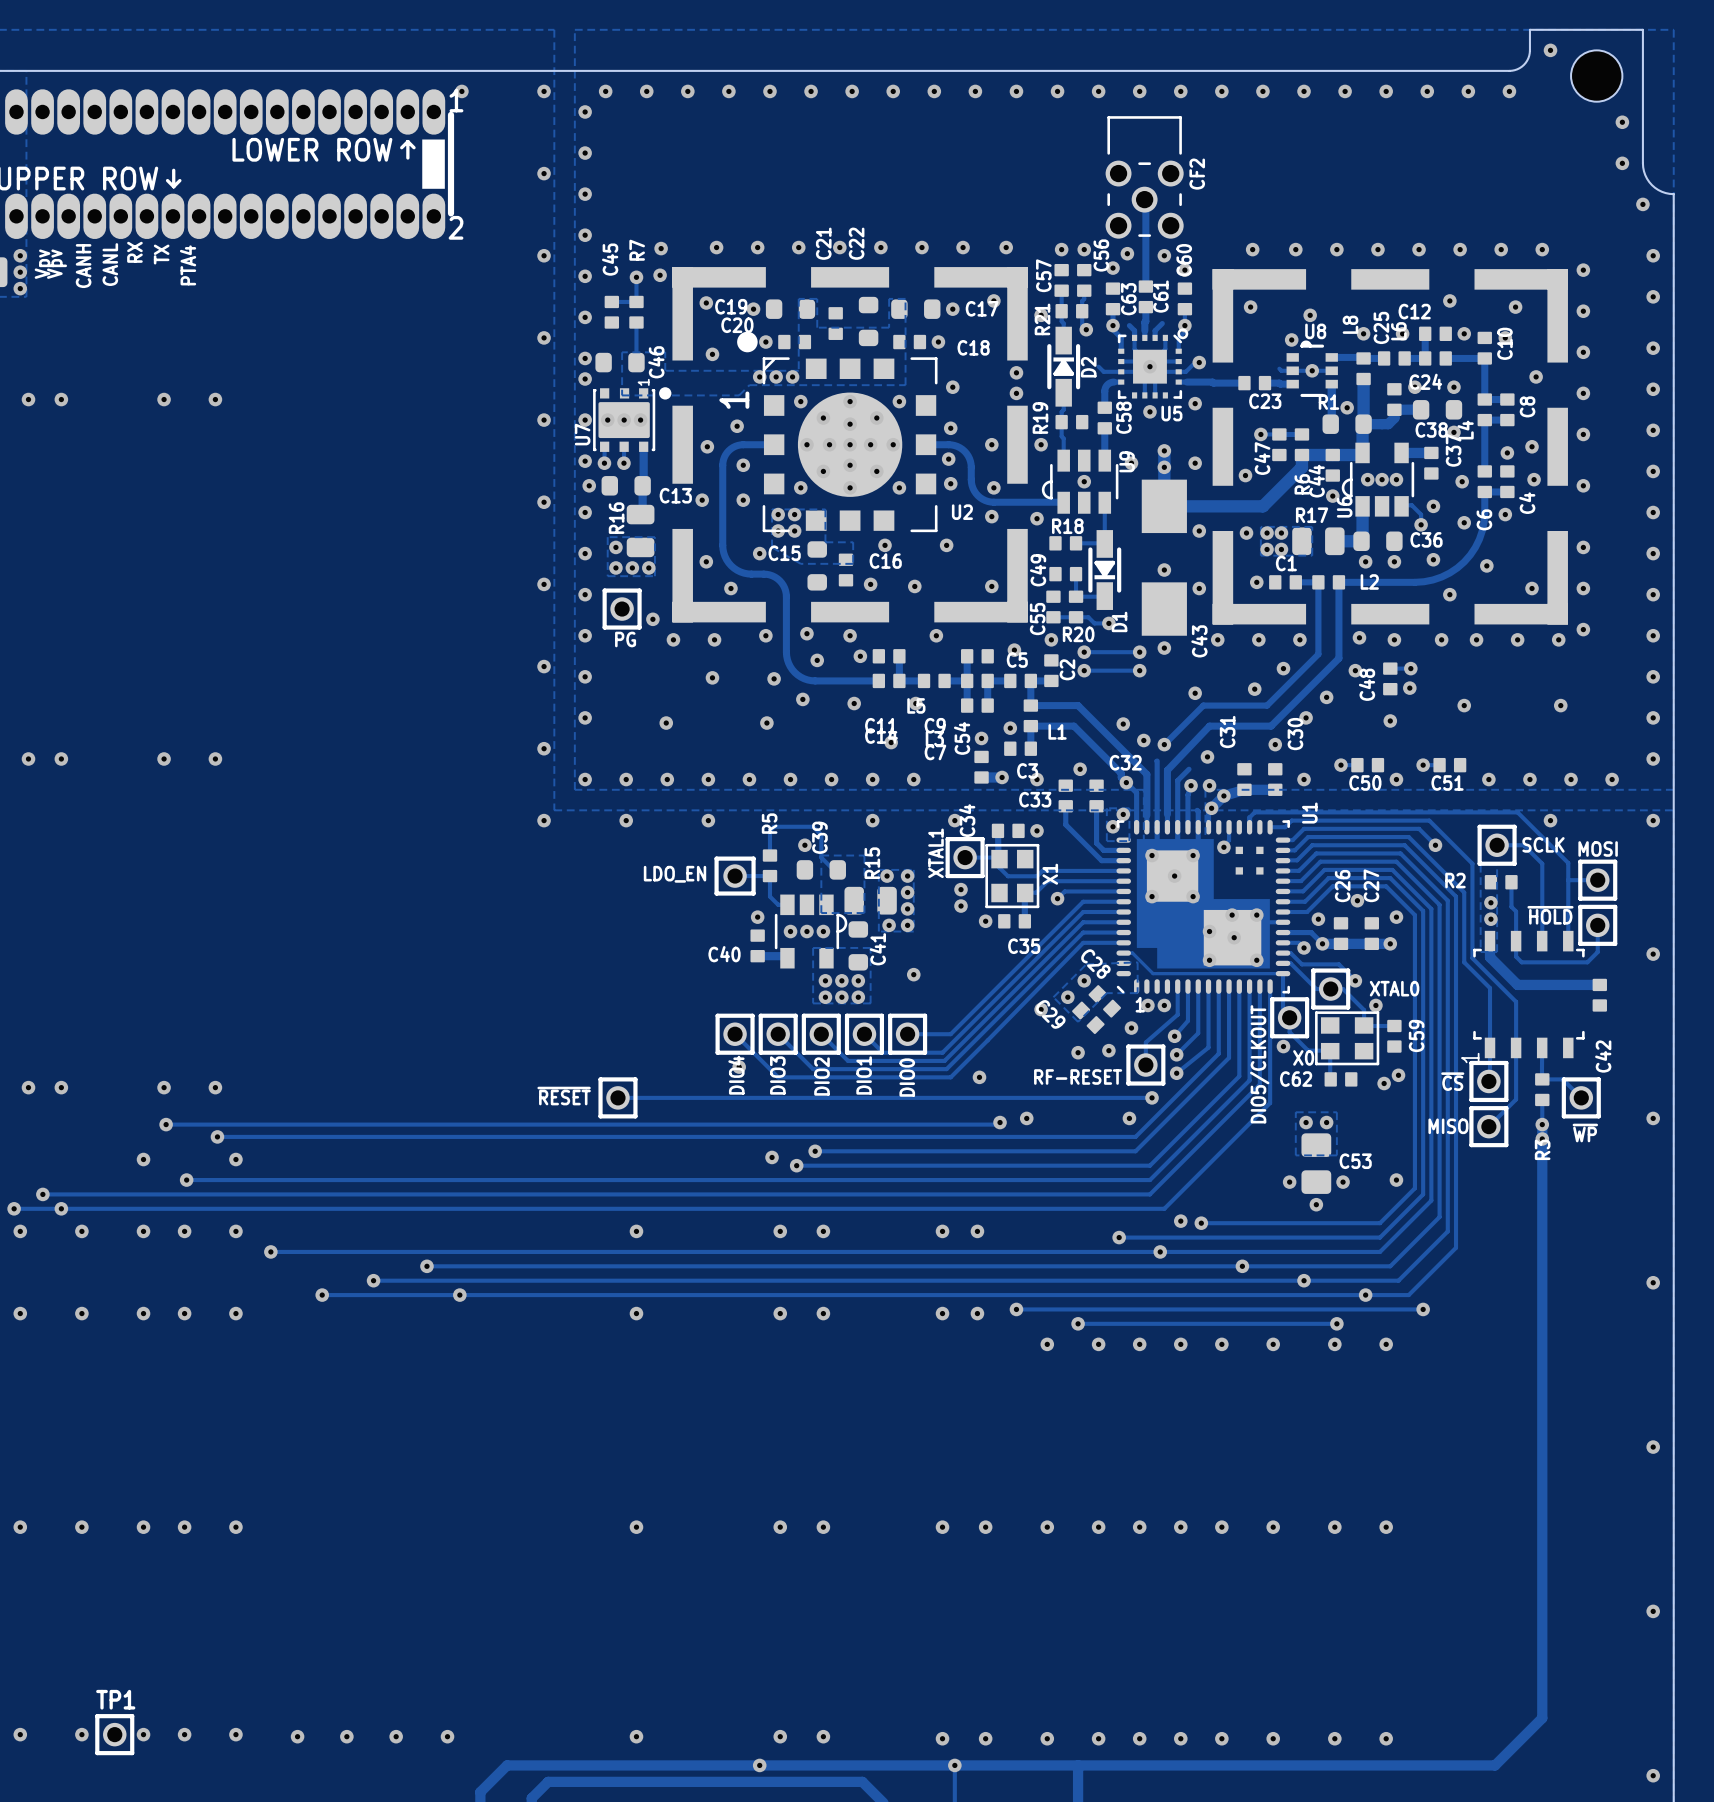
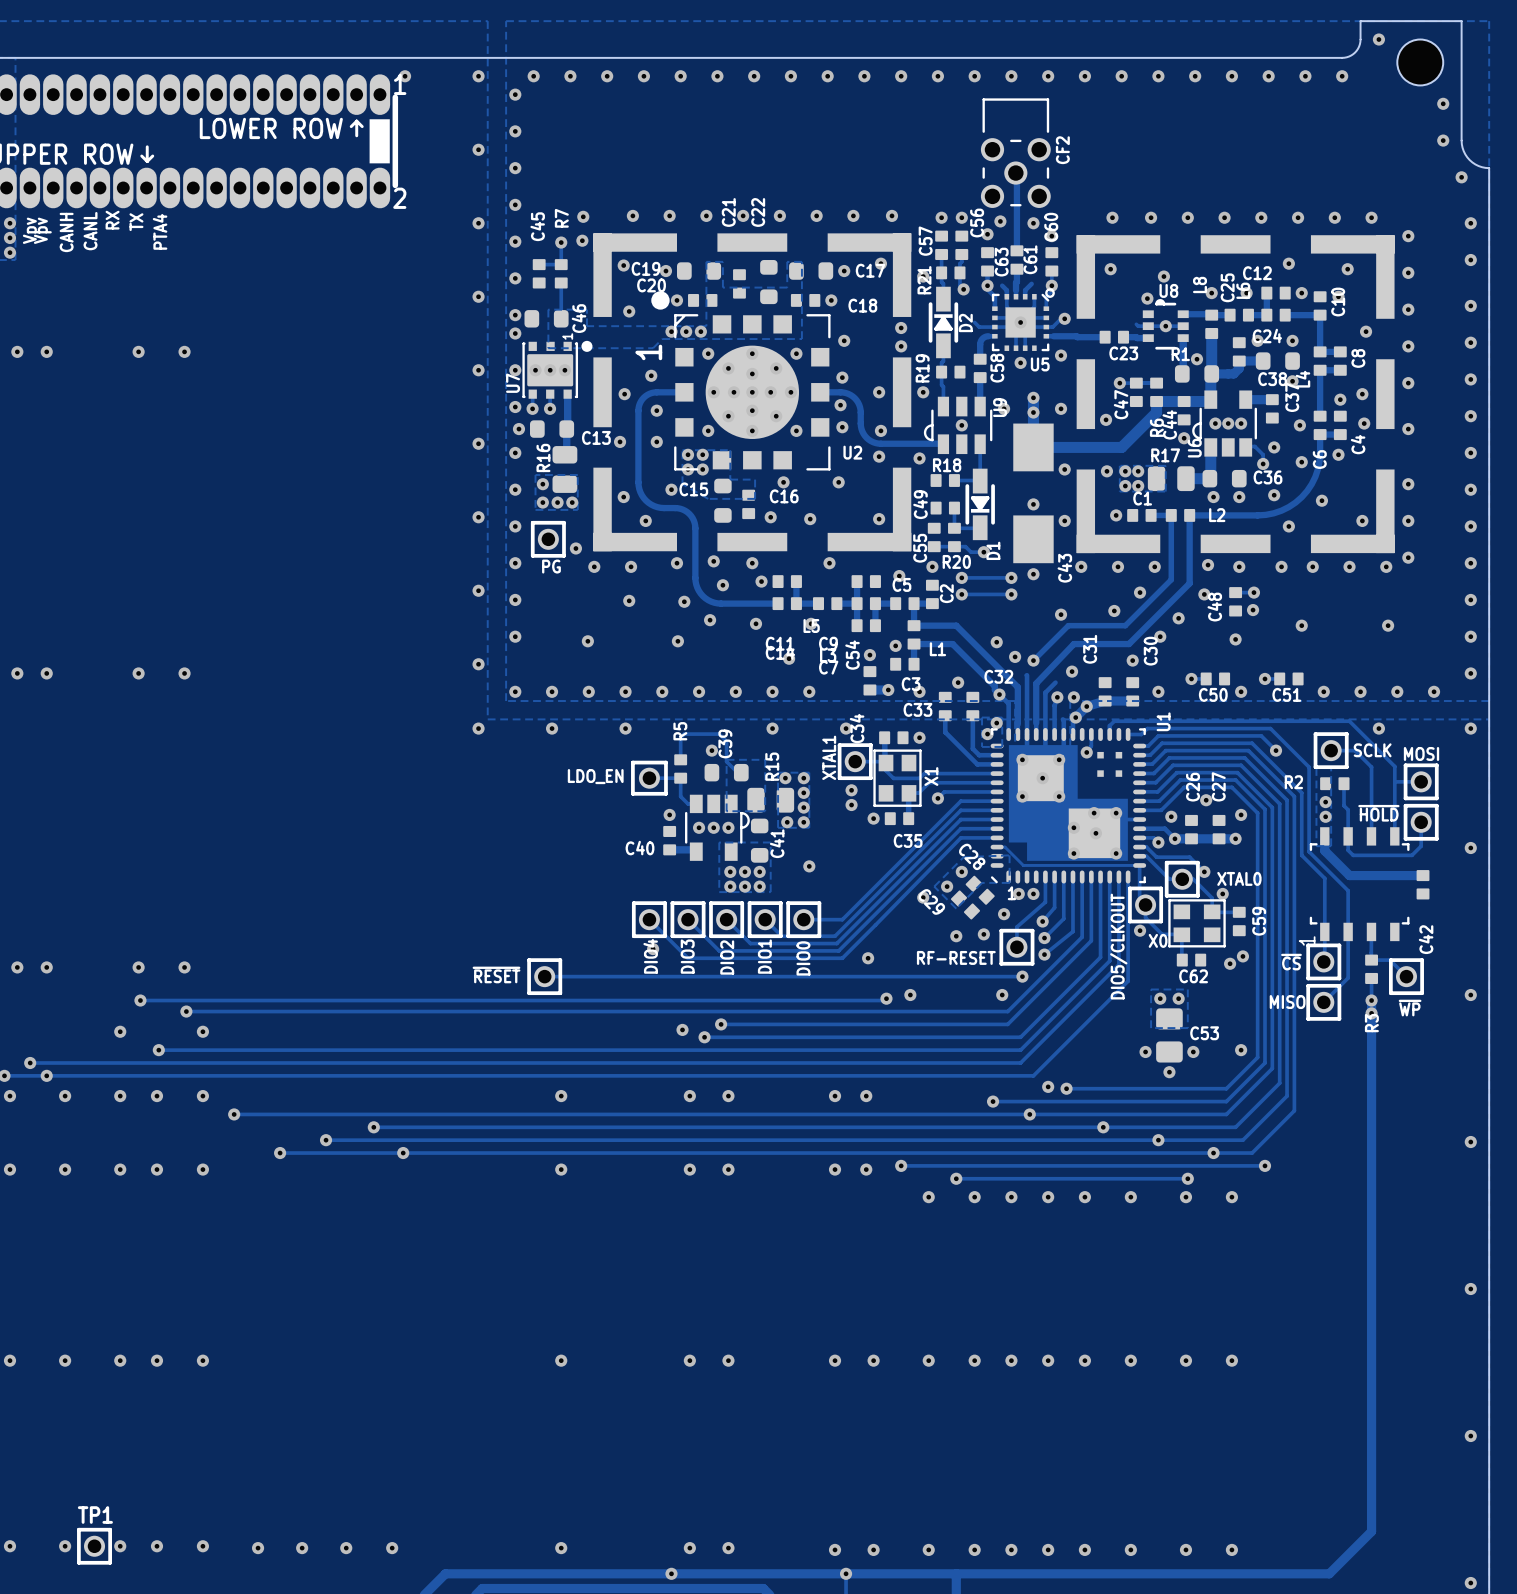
C62 name position: C62 (1296, 1079) -> C62 (1193, 976)

